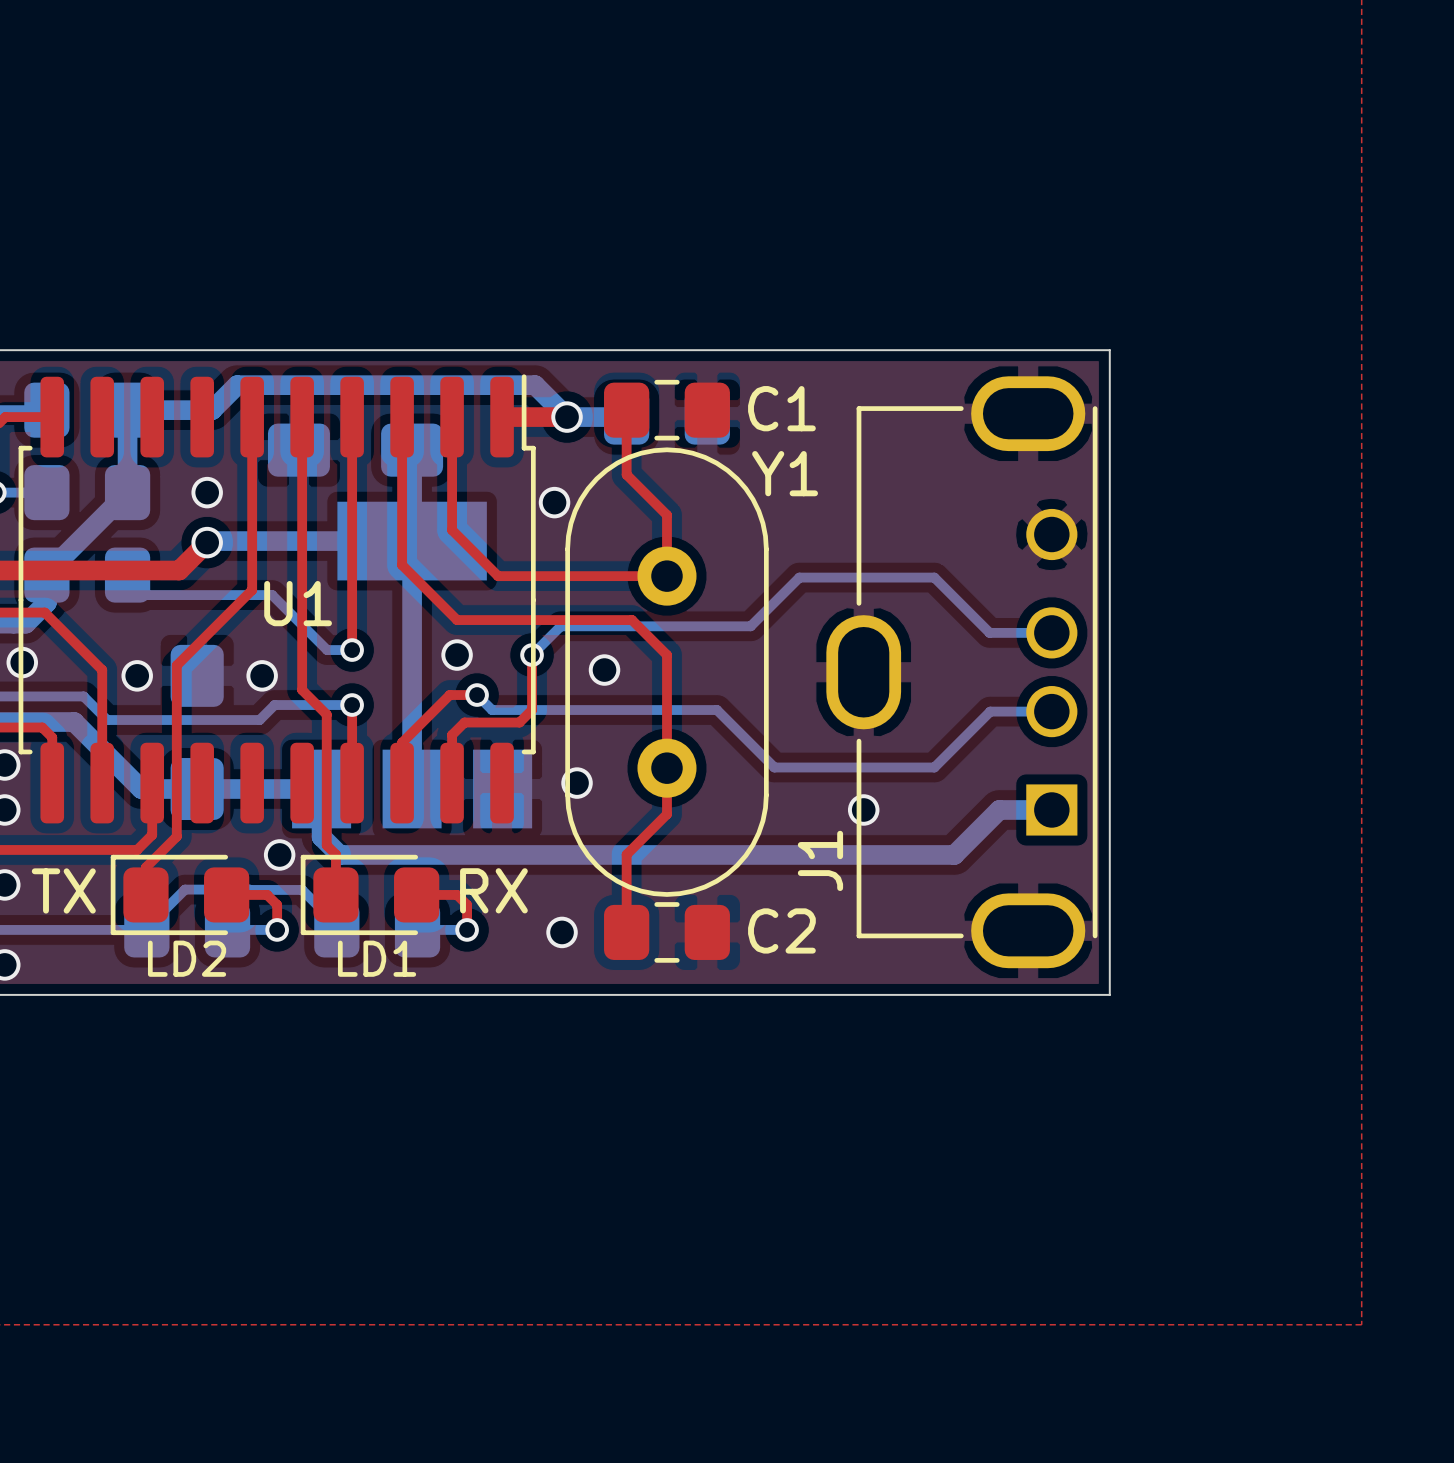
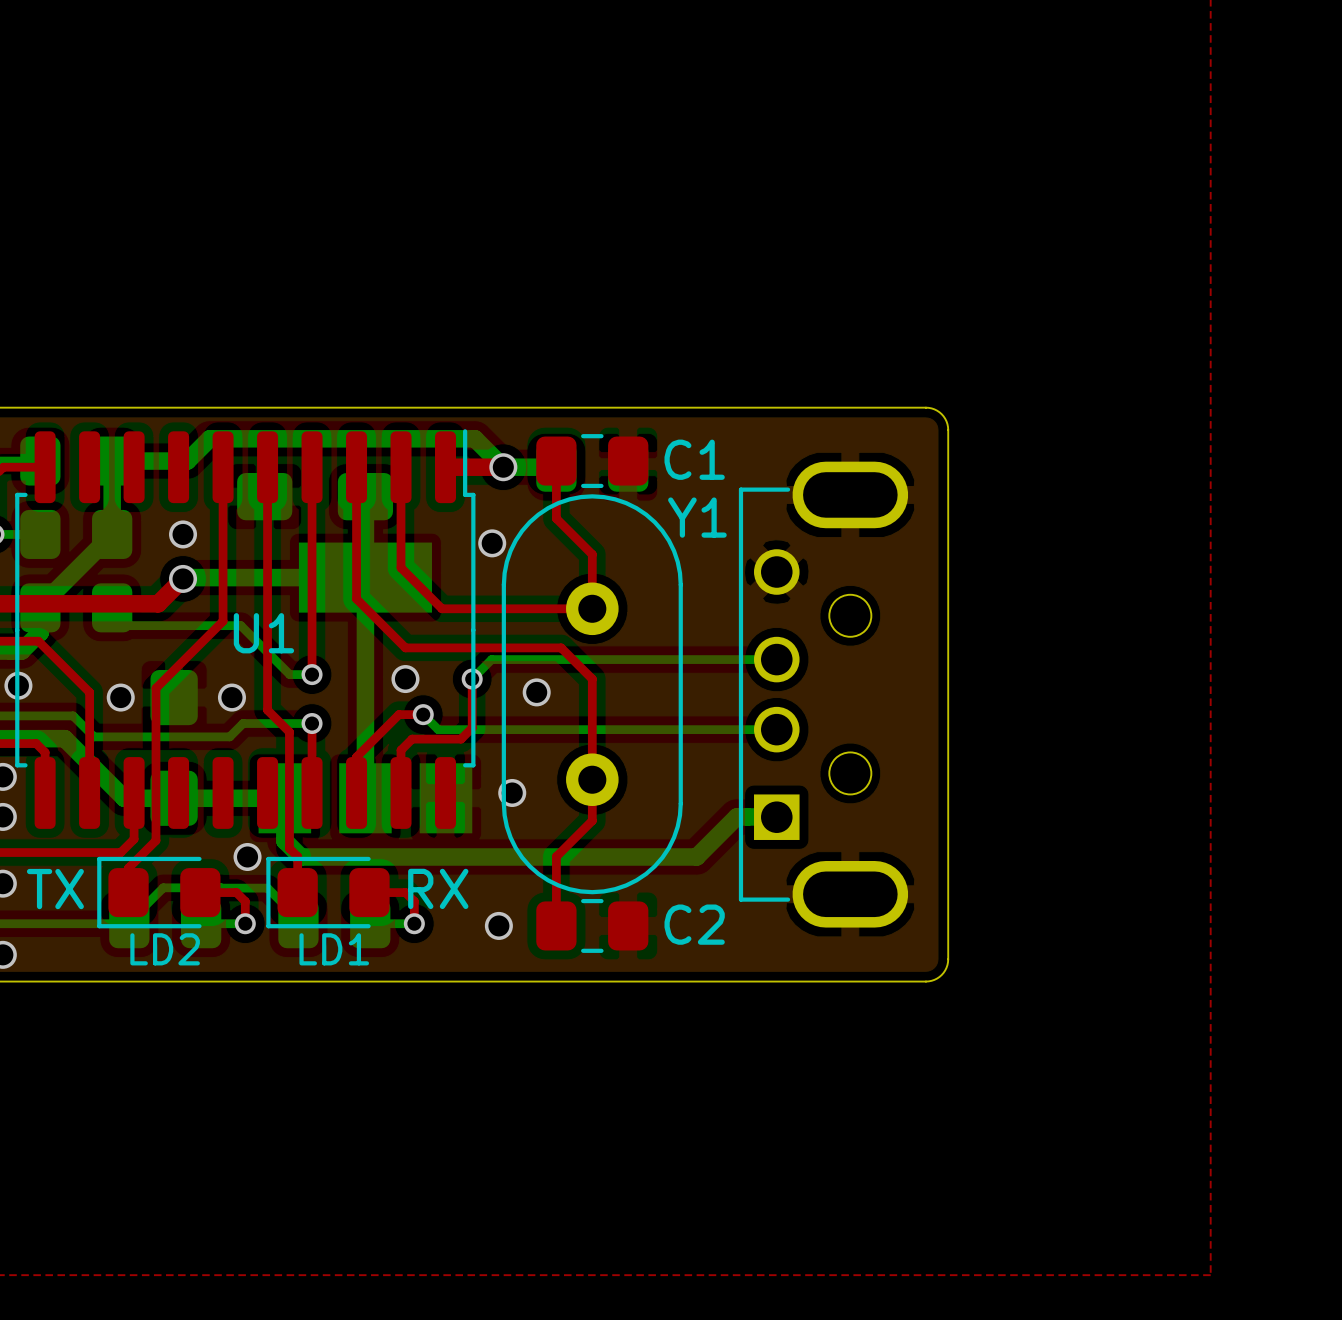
board edge: (1041, 350) (1109, 350) (1109, 994) (1041, 994) -> (925, 407) (934, 409) (941, 414) (946, 421) (948, 429) (948, 959) (946, 967) (941, 975) (934, 979) (925, 981)
bottom track: (1051, 632) (989, 632) (934, 577) (799, 577) (750, 626) (560, 626) (553, 633) -> (776, 659) (491, 659)
part: none -> (823, 694)
J1: (961, 672) -> none
bottom track: (492, 710) (716, 710) (774, 767) (934, 767) (990, 711) (1051, 711) -> (436, 727) (438, 729) (776, 729)
via: (863, 809) -> none
bottom track: (1051, 809) (999, 809) (954, 854) (784, 854) -> (767, 816) (736, 816) (696, 856)

